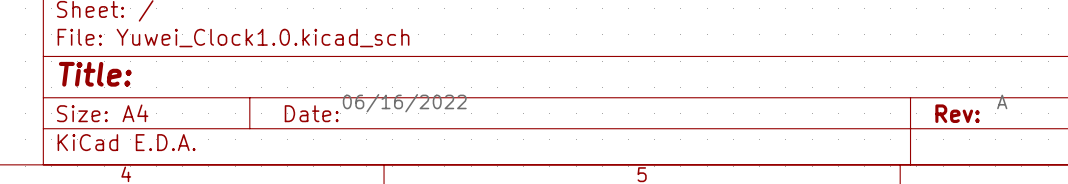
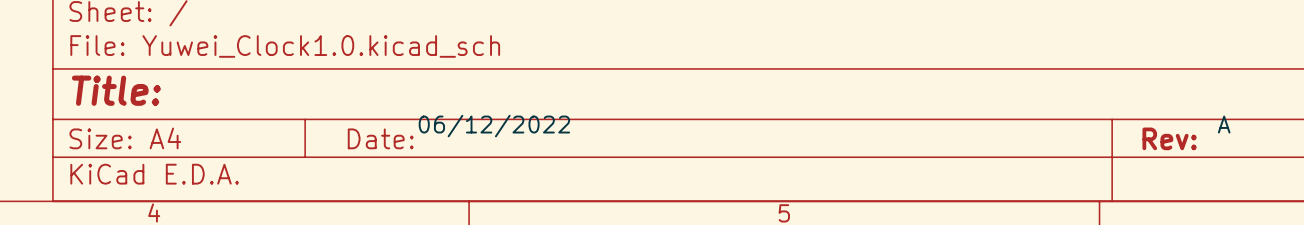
label: 06/16/2022 (404, 103) -> 06/12/2022 (494, 126)

